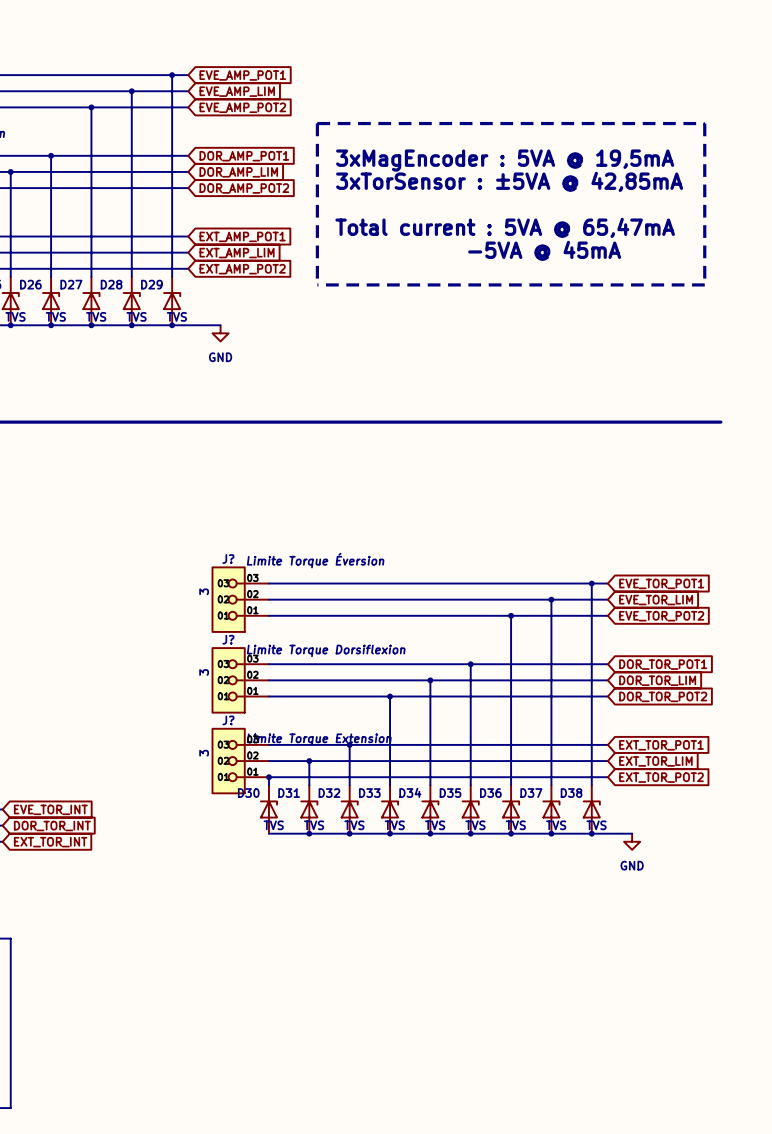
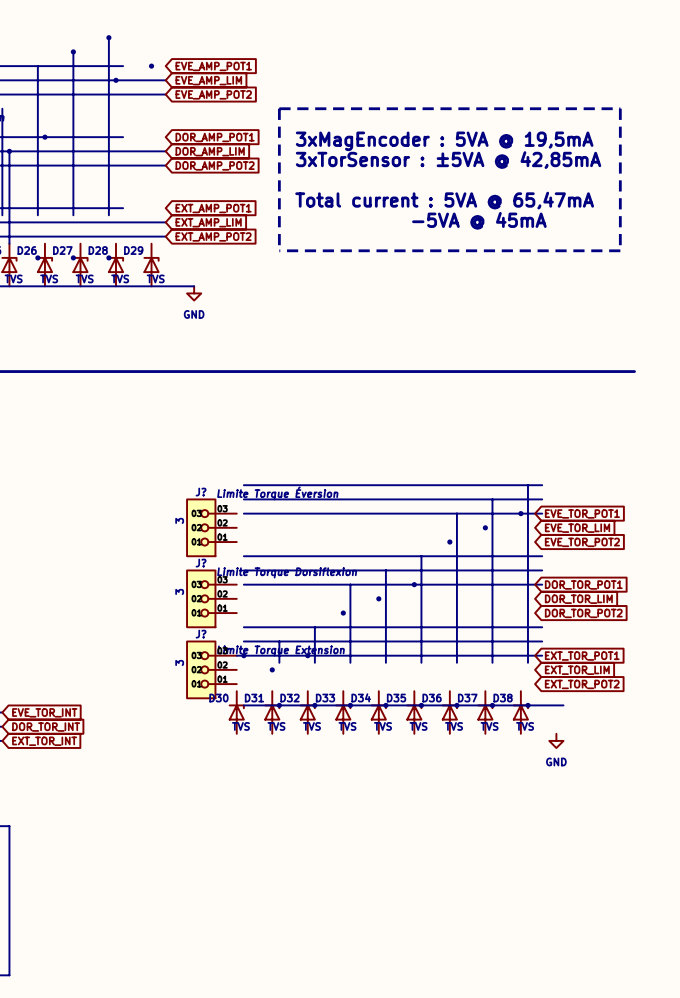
junction: none -> (108, 37)
junction: none -> (73, 51)
wire: (139, 75) (188, 75) -> none
wire: (172, 75) (172, 276) -> (108, 37) (108, 215)
wire: (131, 91) (131, 276) -> (73, 51) (73, 215)
wire: (91, 107) (91, 276) -> (37, 66) (37, 215)
junction: (91, 107) -> none
wire: (51, 155) (51, 276) -> (2, 108) (2, 215)
wire: (139, 155) (188, 155) -> none
wire: (139, 236) (188, 236) -> none
junction: none -> (37, 257)
junction: none -> (73, 257)
junction: none -> (108, 257)
junction: (10, 325) -> none
junction: (51, 325) -> none
junction: (91, 325) -> none
junction: (131, 325) -> none
junction: (172, 325) -> none
wire: none -> (243, 485) (542, 485)
wire: (268, 583) (277, 583) -> none
wire: (591, 583) (591, 785) -> (527, 485) (527, 662)
wire: none -> (535, 513) (542, 513)
wire: (268, 599) (607, 599) -> (243, 499) (542, 499)
wire: (551, 599) (551, 785) -> (492, 499) (492, 662)
wire: (268, 615) (607, 615) -> (243, 556) (542, 556)
wire: (511, 615) (511, 785) -> (456, 513) (456, 662)
wire: (268, 664) (277, 664) -> none
wire: (470, 664) (470, 785) -> (421, 556) (421, 662)
wire: none -> (535, 584) (542, 584)
wire: (268, 680) (607, 680) -> (243, 570) (542, 570)
wire: (430, 680) (430, 785) -> (385, 570) (385, 662)
wire: (268, 696) (607, 696) -> (243, 627) (542, 627)
wire: (390, 696) (390, 785) -> (350, 584) (350, 662)
junction: none -> (243, 655)
wire: (349, 744) (349, 785) -> (314, 627) (314, 662)
wire: none -> (535, 655) (542, 655)
wire: (268, 761) (607, 761) -> (243, 641) (542, 641)
wire: (309, 761) (309, 785) -> (279, 641) (279, 662)
junction: (268, 777) -> none
wire: (607, 777) (268, 777) (268, 785) -> none
junction: none -> (279, 705)
junction: none -> (314, 705)
junction: none -> (350, 705)
junction: none -> (385, 705)
junction: none -> (421, 705)
junction: none -> (456, 705)
junction: none -> (492, 705)
junction: none -> (527, 705)
wire: (268, 833) (632, 833) -> (243, 705) (563, 705)
junction: (309, 833) -> none
junction: (349, 833) -> none
junction: (390, 833) -> none
junction: (430, 833) -> none
junction: (470, 833) -> none
junction: (511, 833) -> none
junction: (551, 833) -> none
junction: (591, 833) -> none

